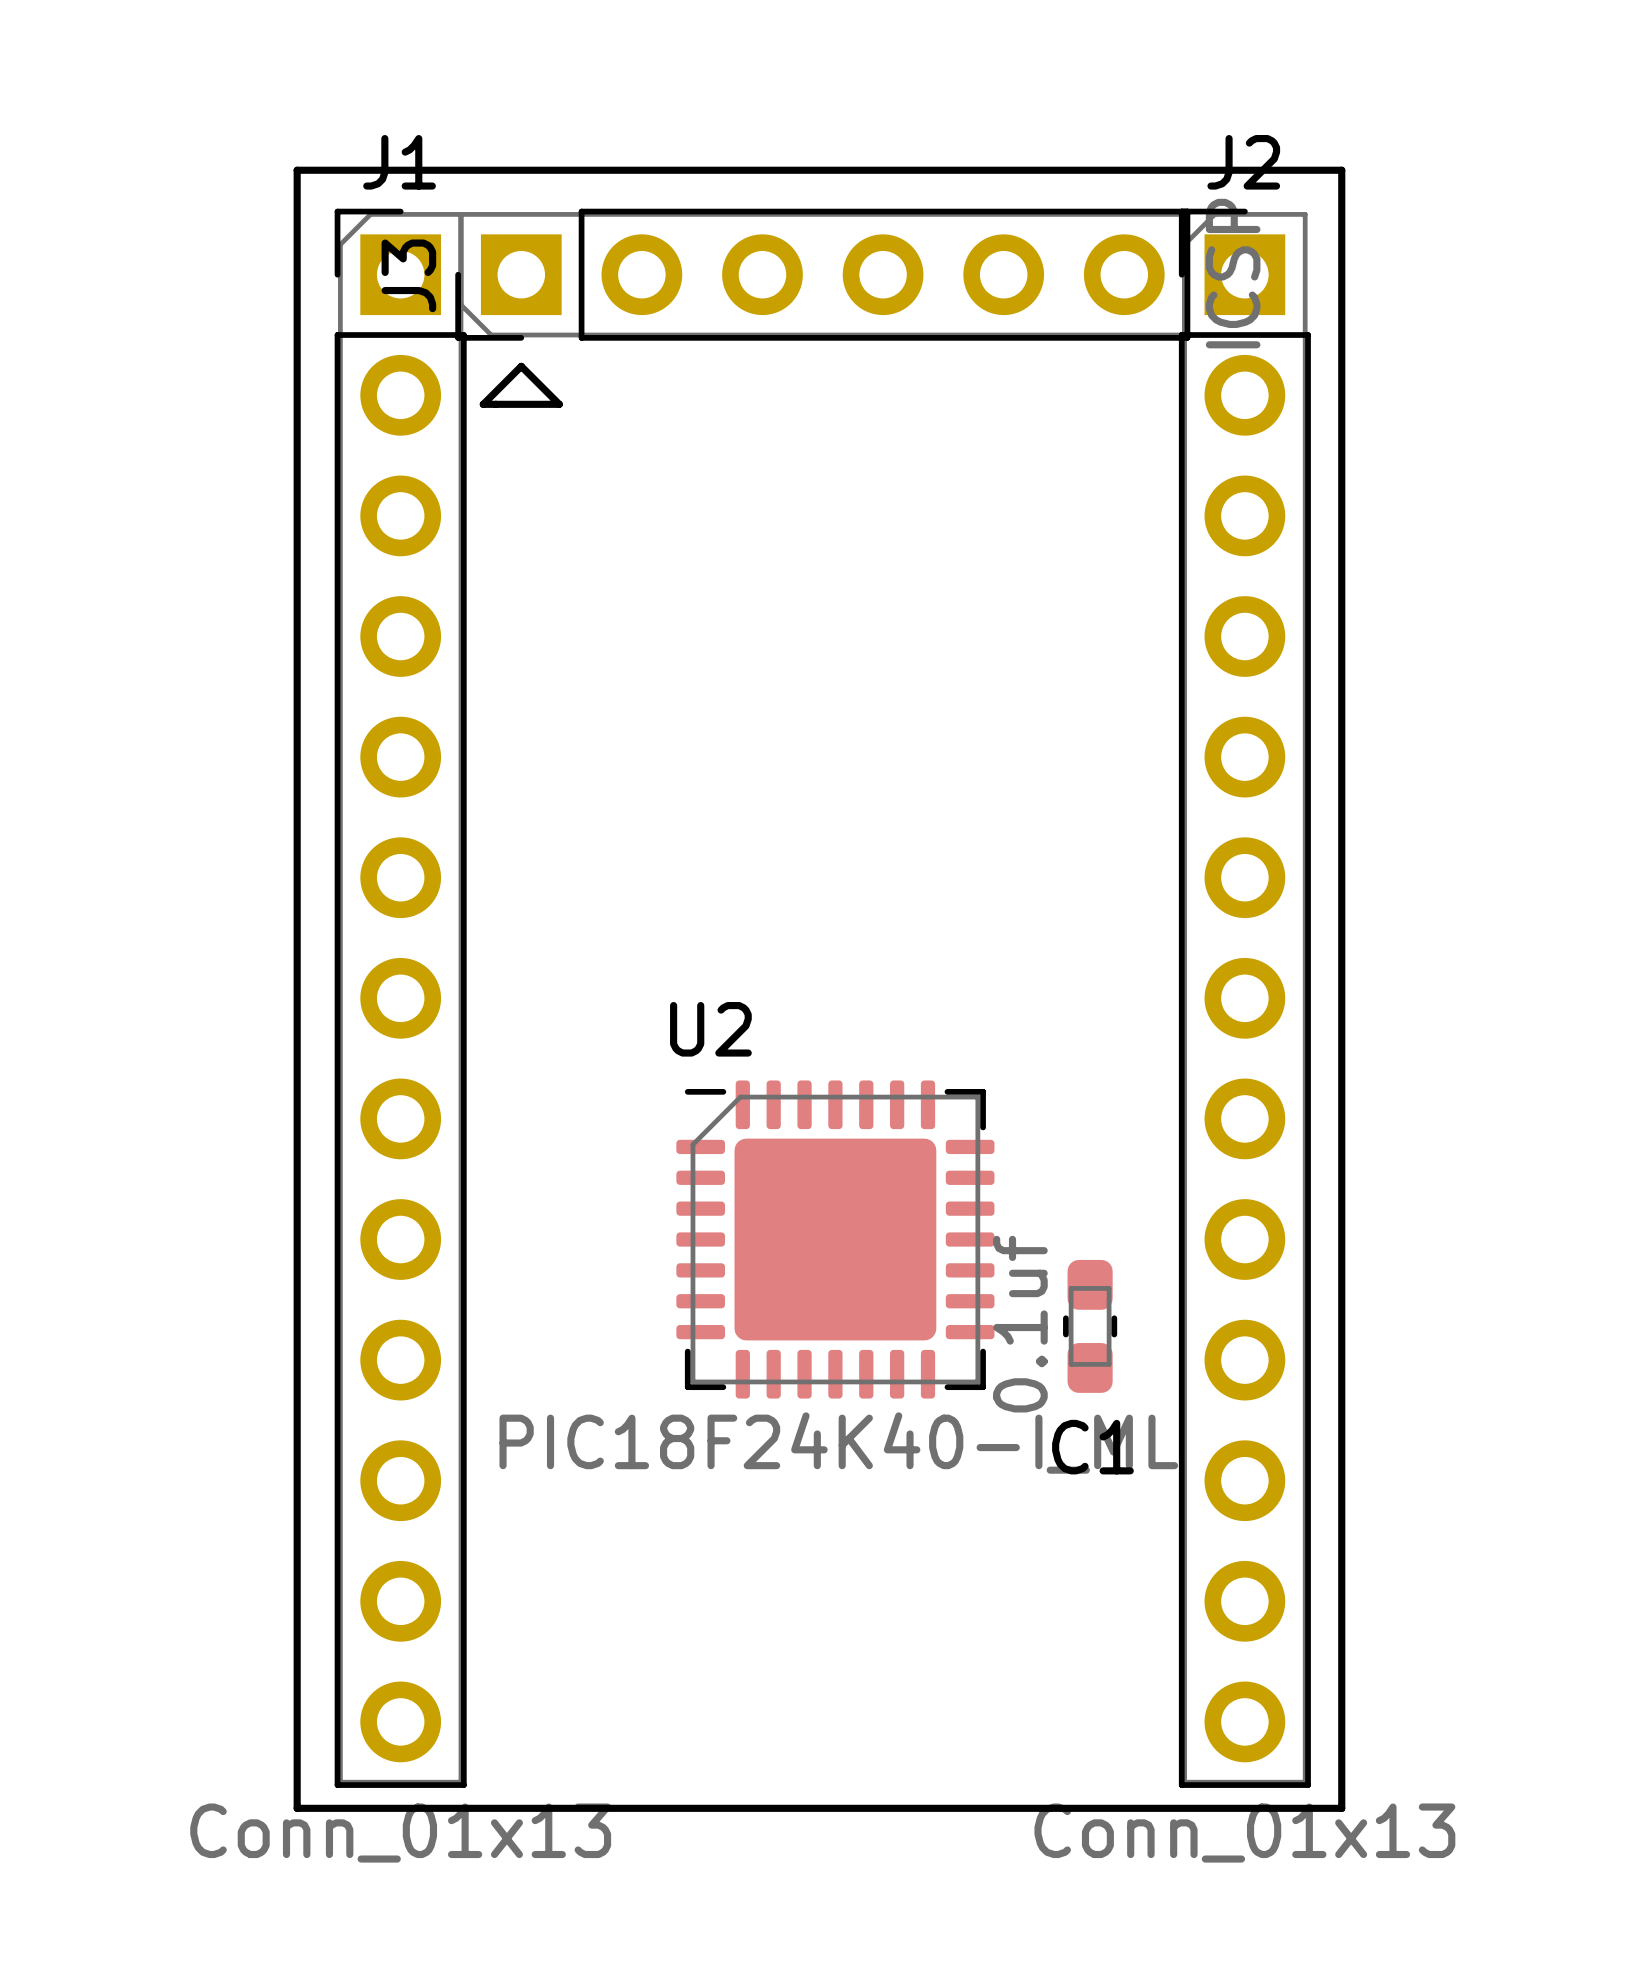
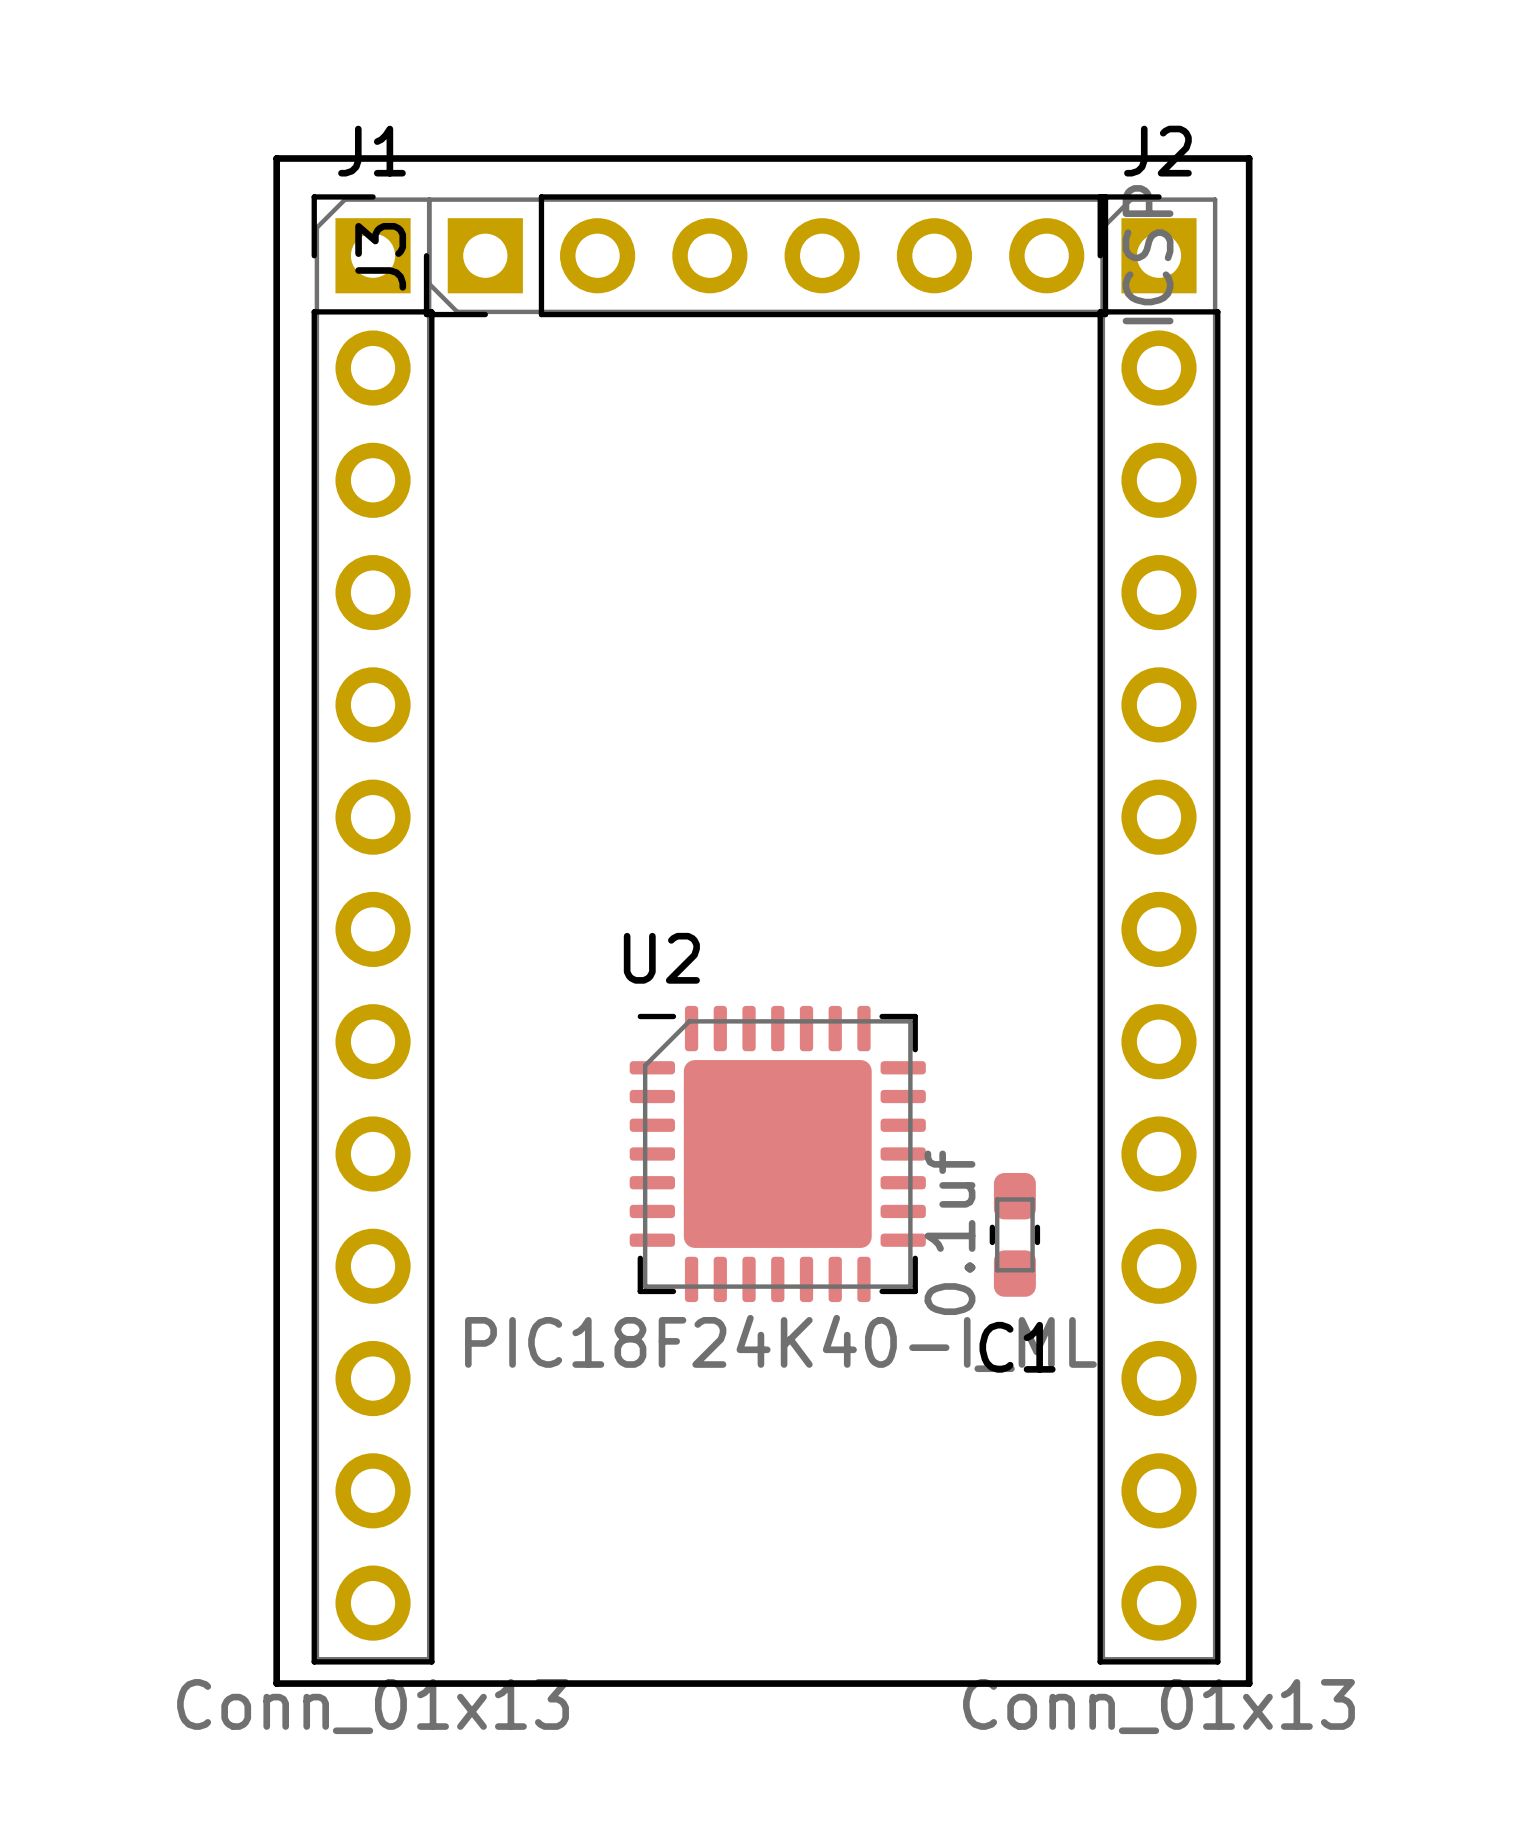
J3 footprint: [455, 208, 1191, 408] -> [423, 194, 1109, 318]

